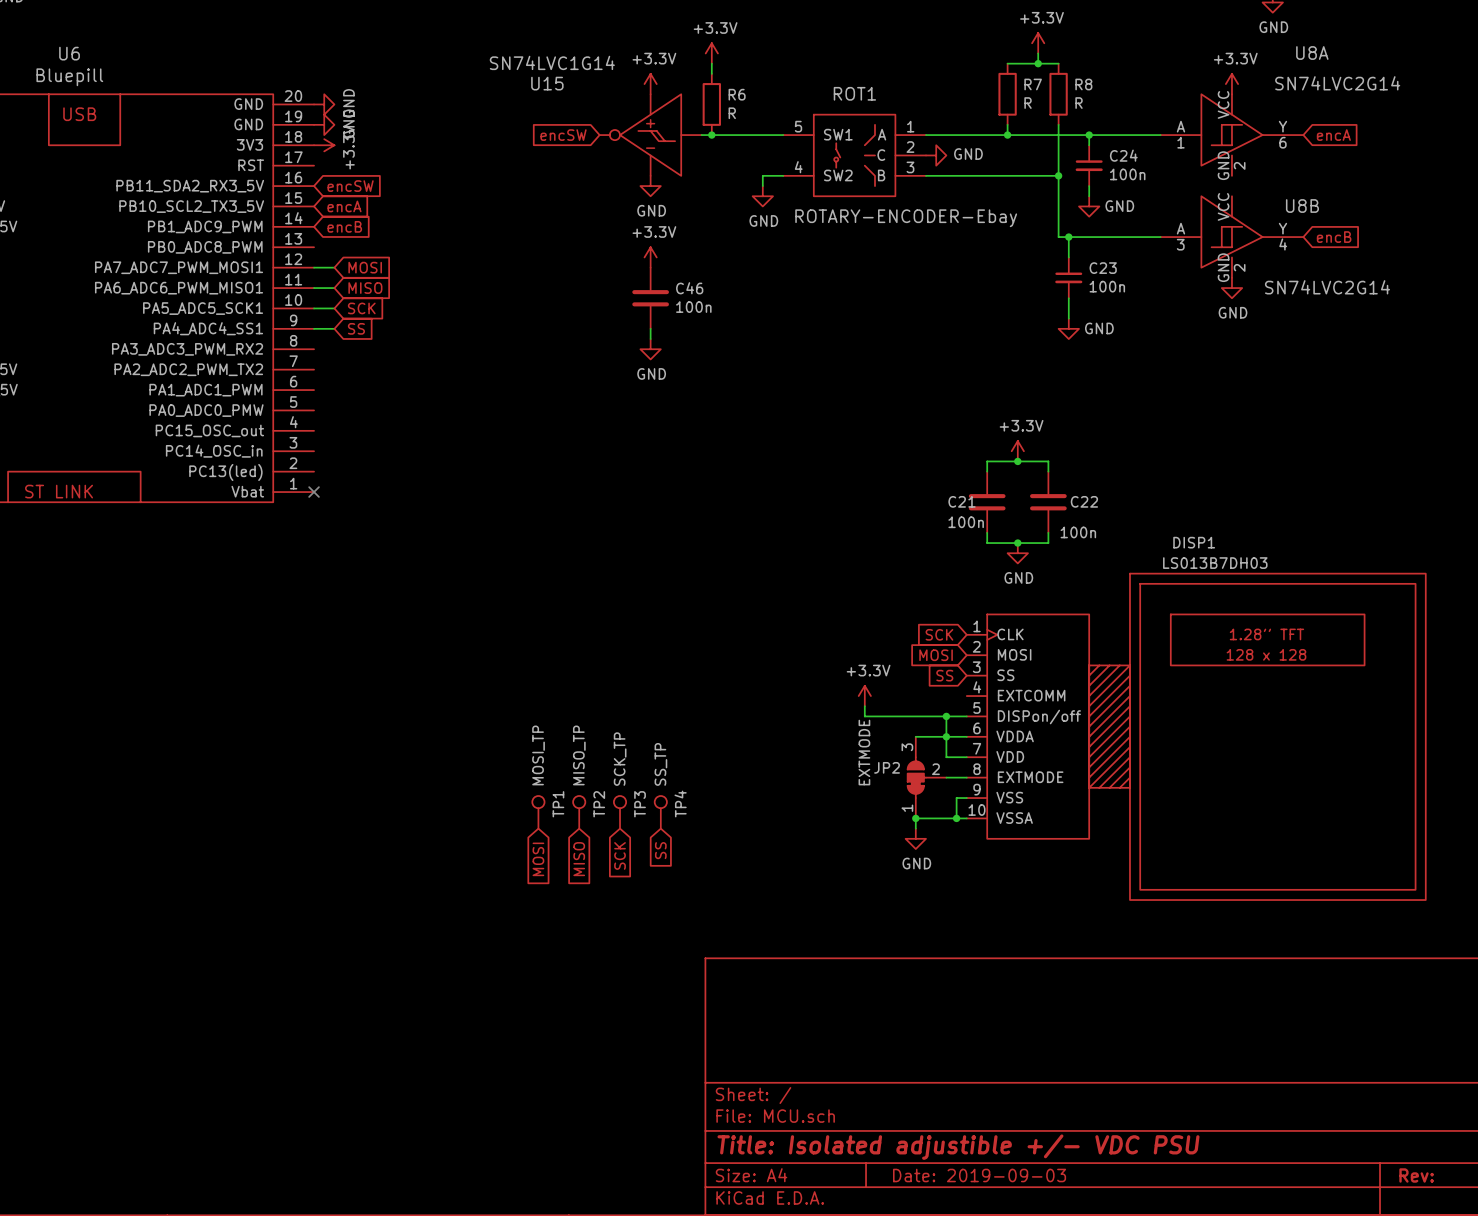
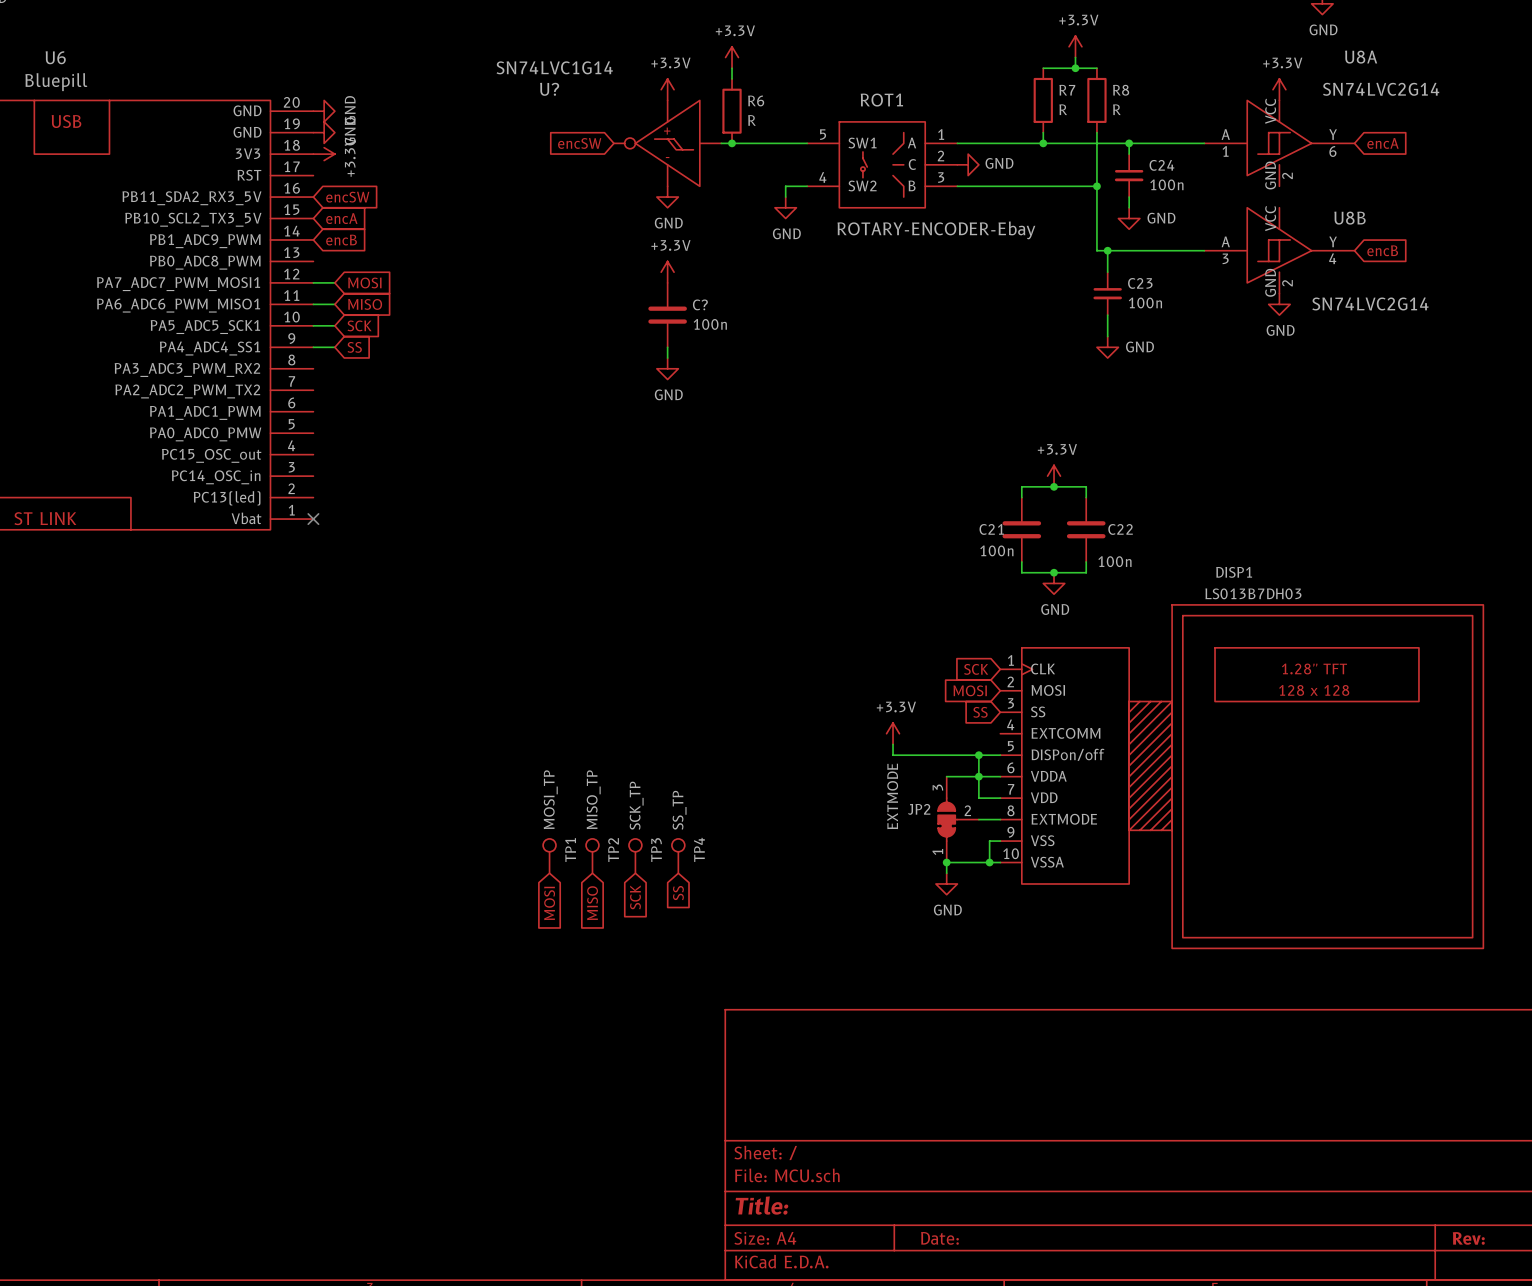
U15 name: U15 (547, 83) -> U? (549, 89)
C46 name: C46 (689, 288) -> C? (700, 304)
title block: Title: Isolated adjustible +/- VDC PSU (958, 1147) -> Title: (761, 1205)
title block: Date: 2019-09-03 (979, 1175) -> Date: (939, 1238)

